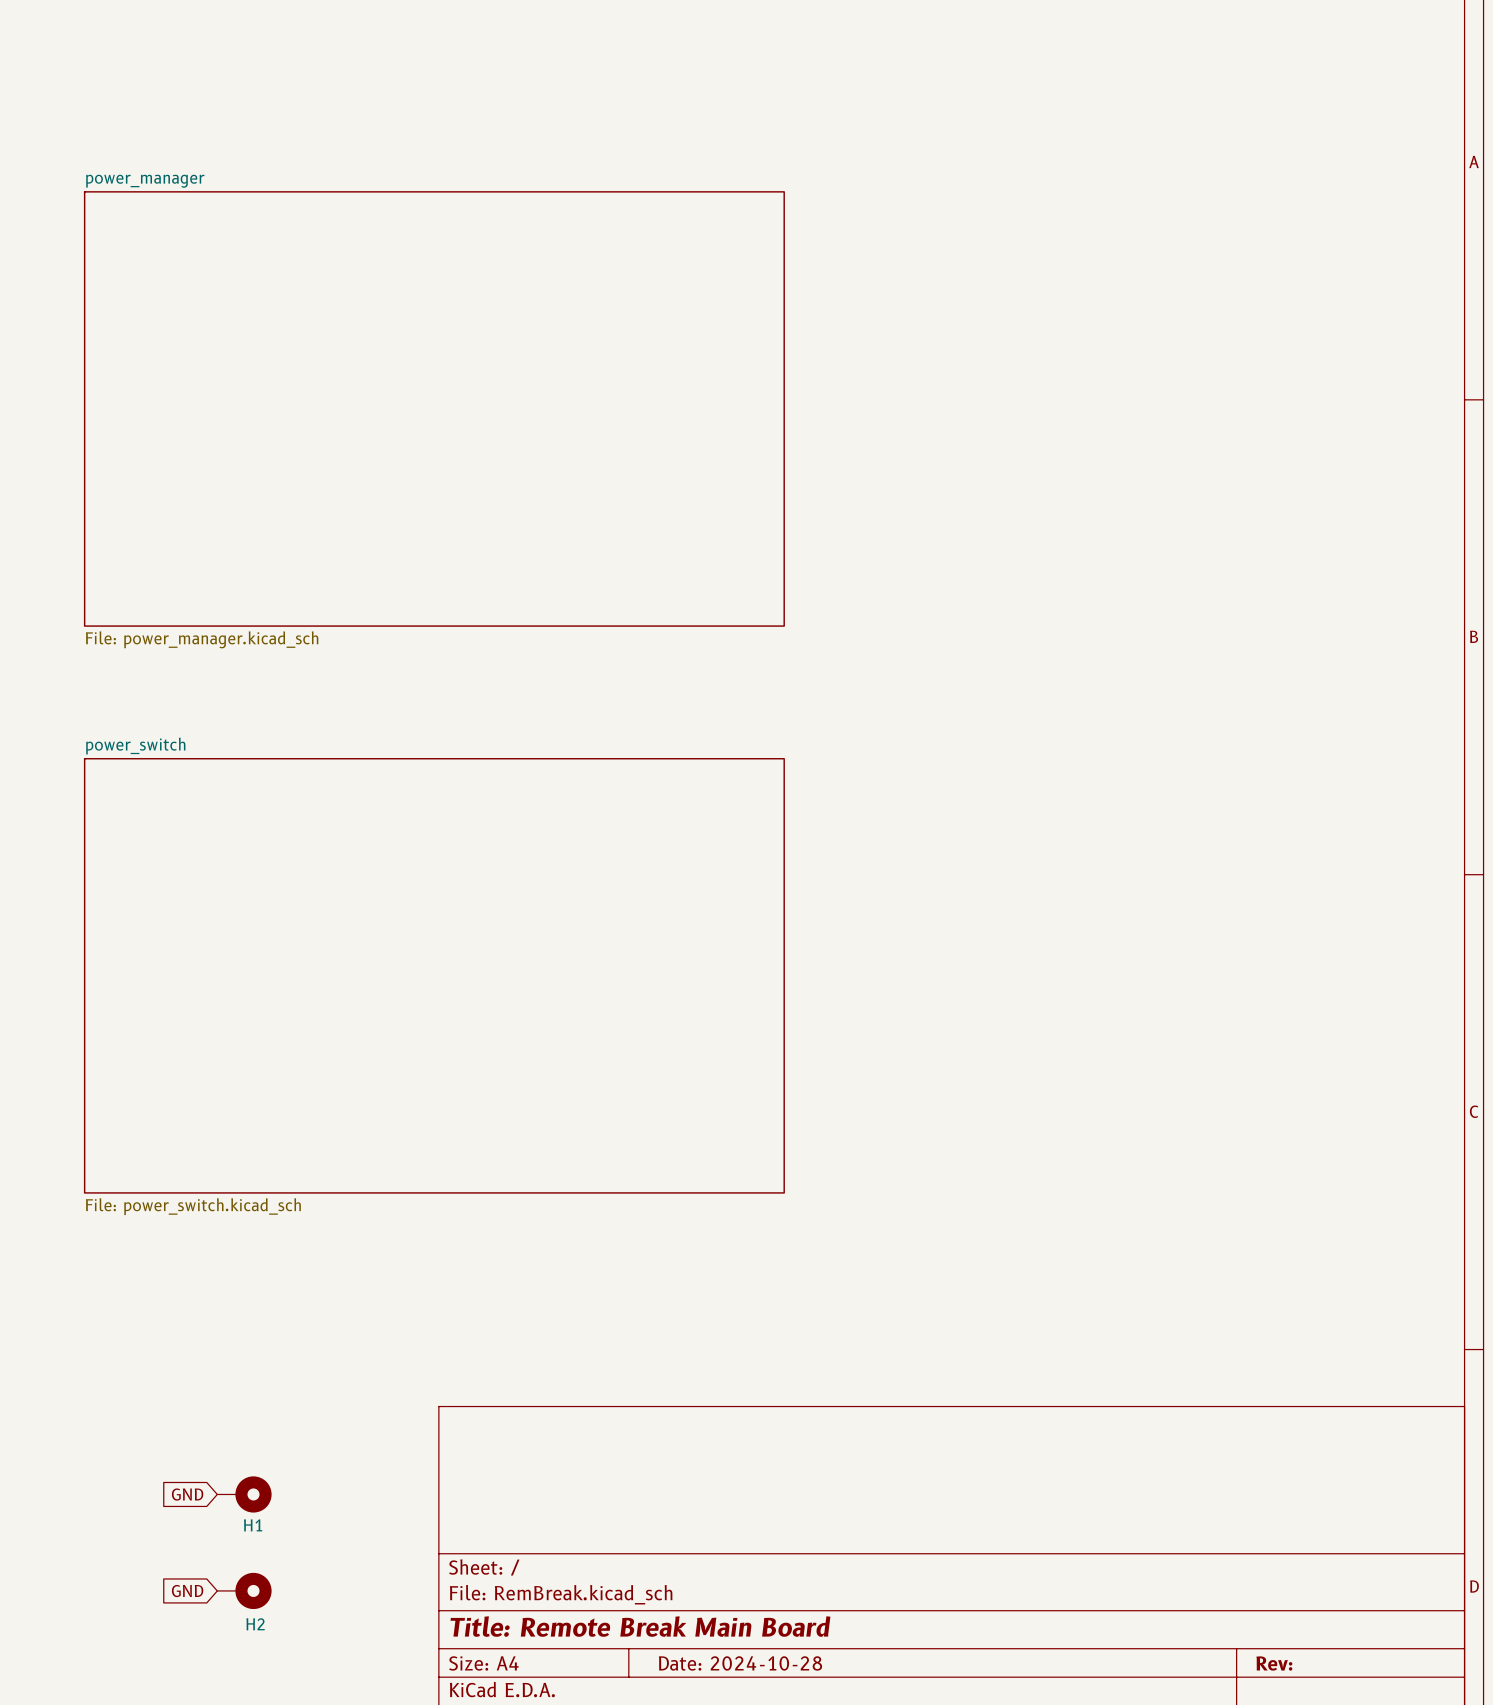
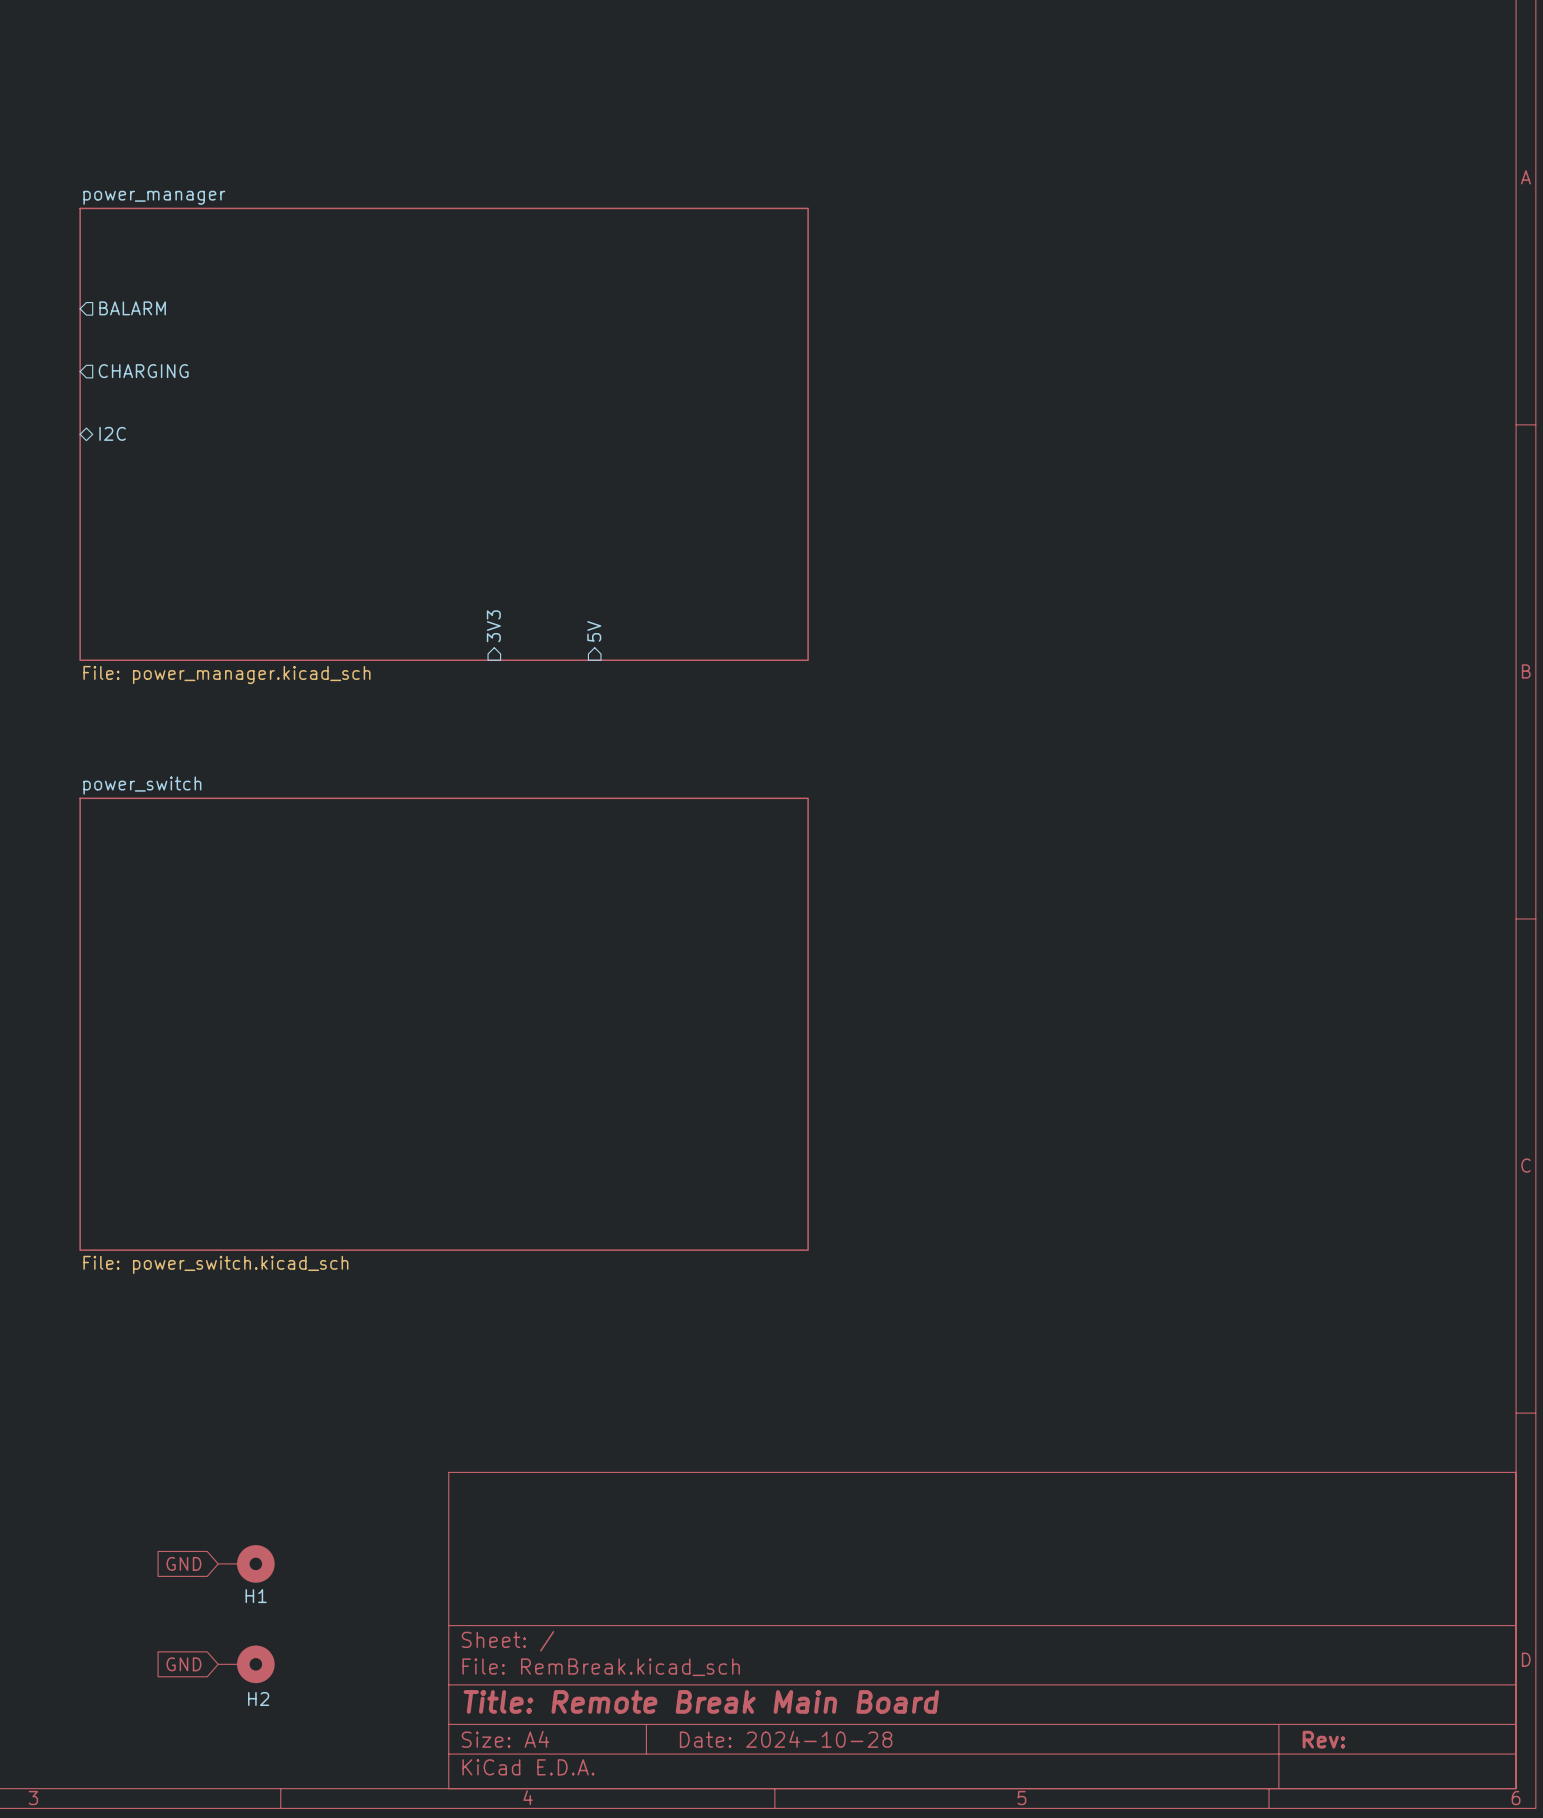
sheet pin: none -> BALARM (132, 308)
sheet pin: none -> CHARGING (143, 371)
sheet pin: none -> I2C (112, 433)
sheet pin: none -> 3V3 (493, 626)
sheet pin: none -> 5V (594, 631)

